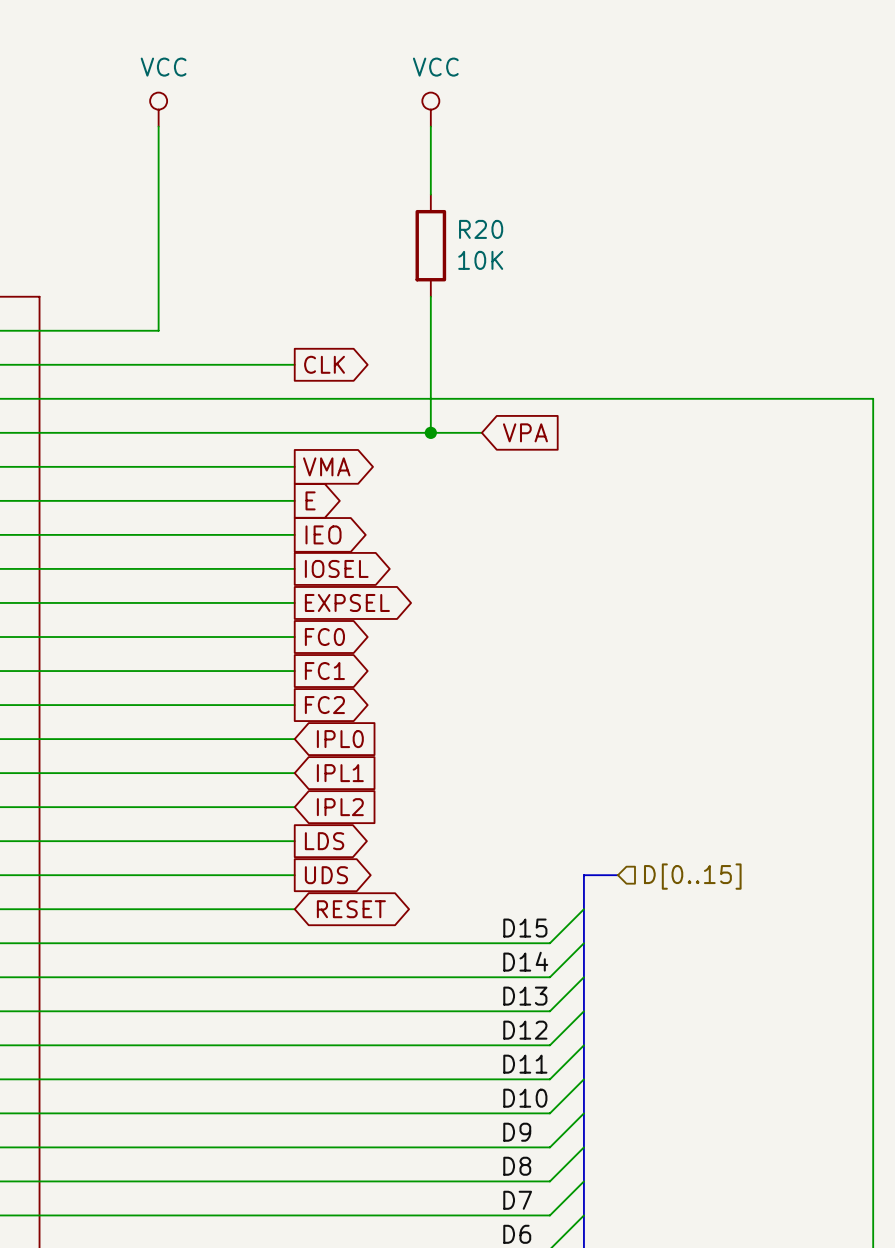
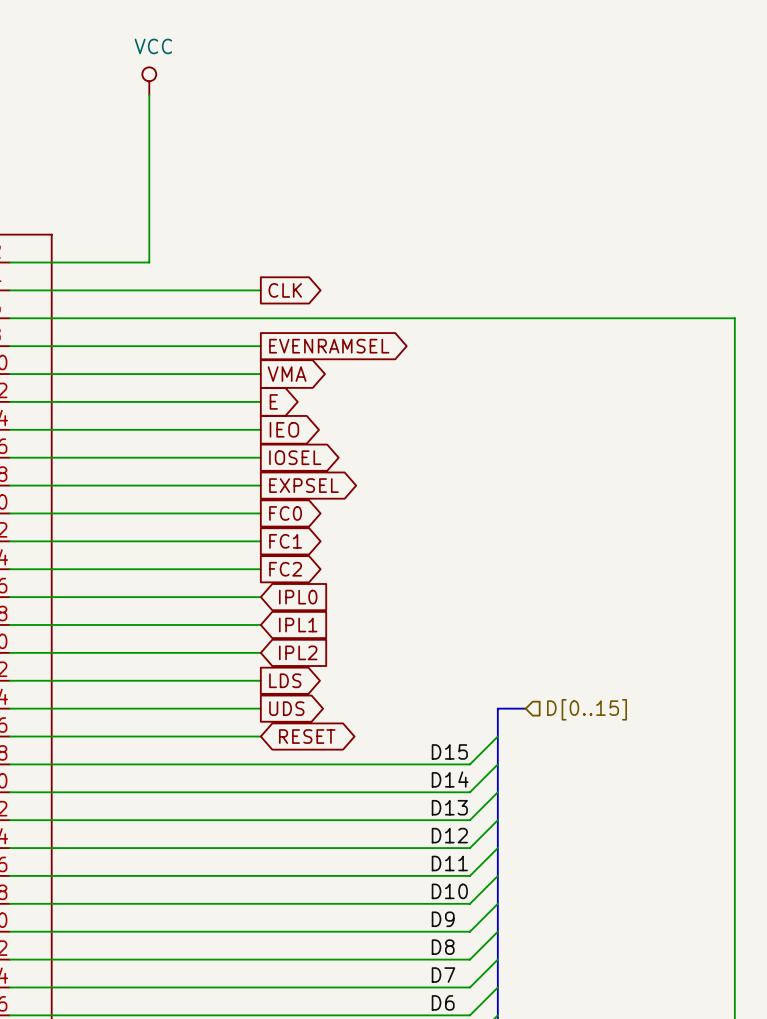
power symbol: VCC (430, 109) -> none
wire: (430, 126) (430, 194) -> none
R20: 10K (430, 245) -> none
wire: (430, 296) (430, 432) -> none
wire: (294, 432) (481, 432) -> none
global label: none -> EVENRAMSEL (329, 346)
junction: (430, 432) -> none
global label: VPA (525, 432) -> none

